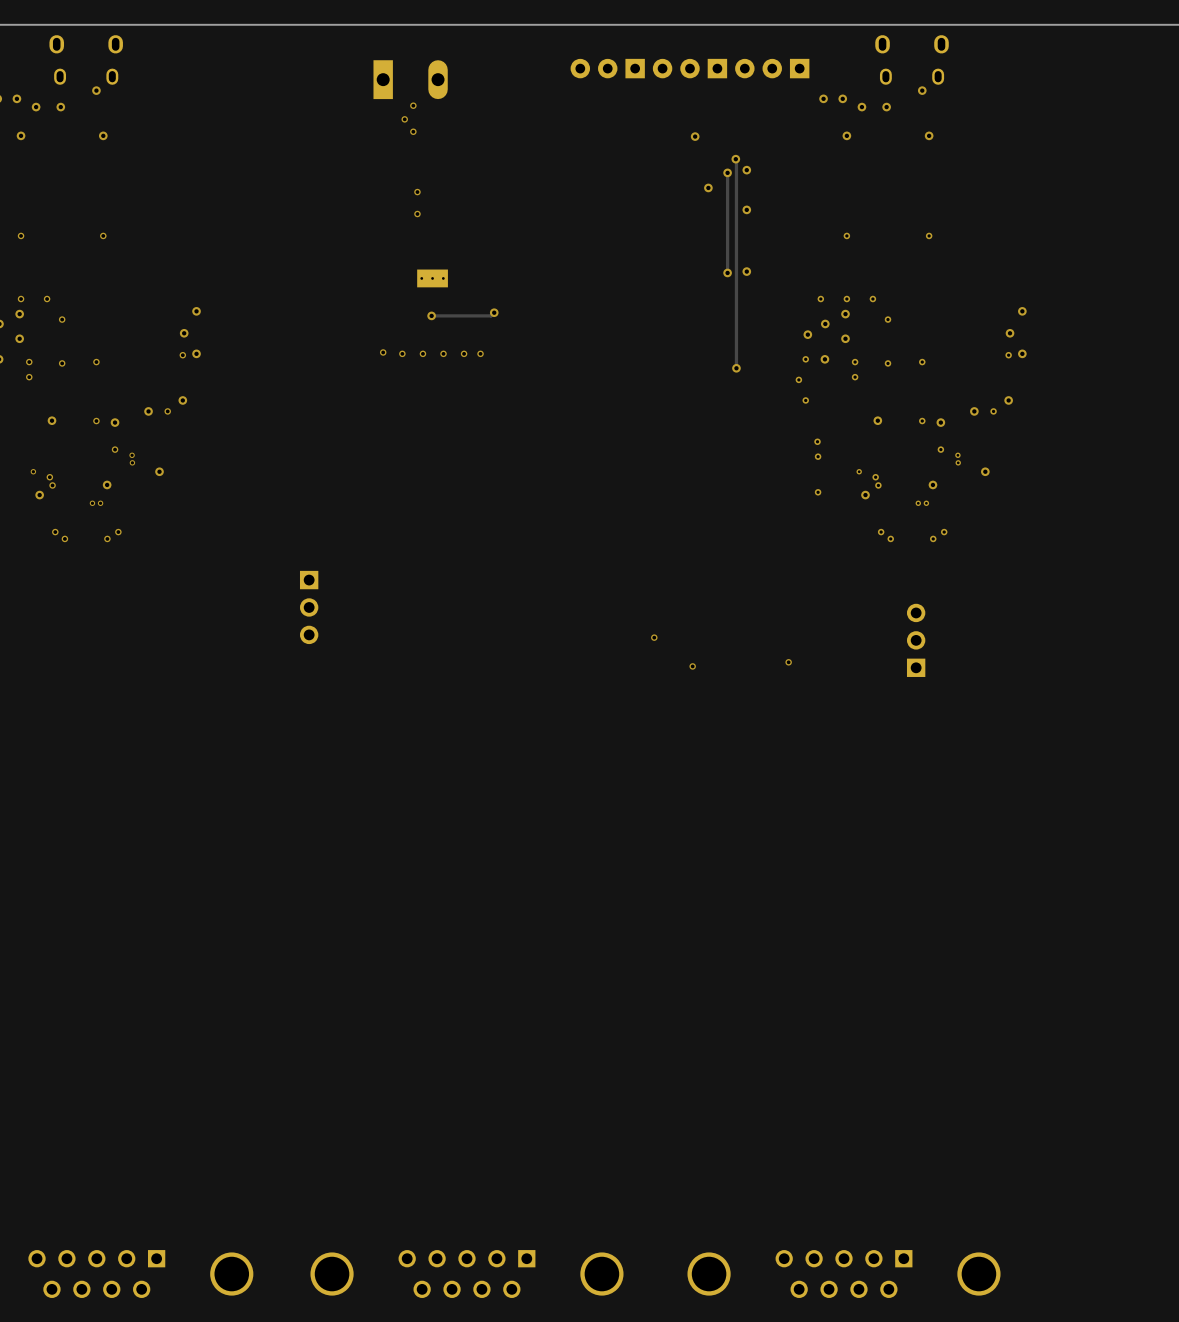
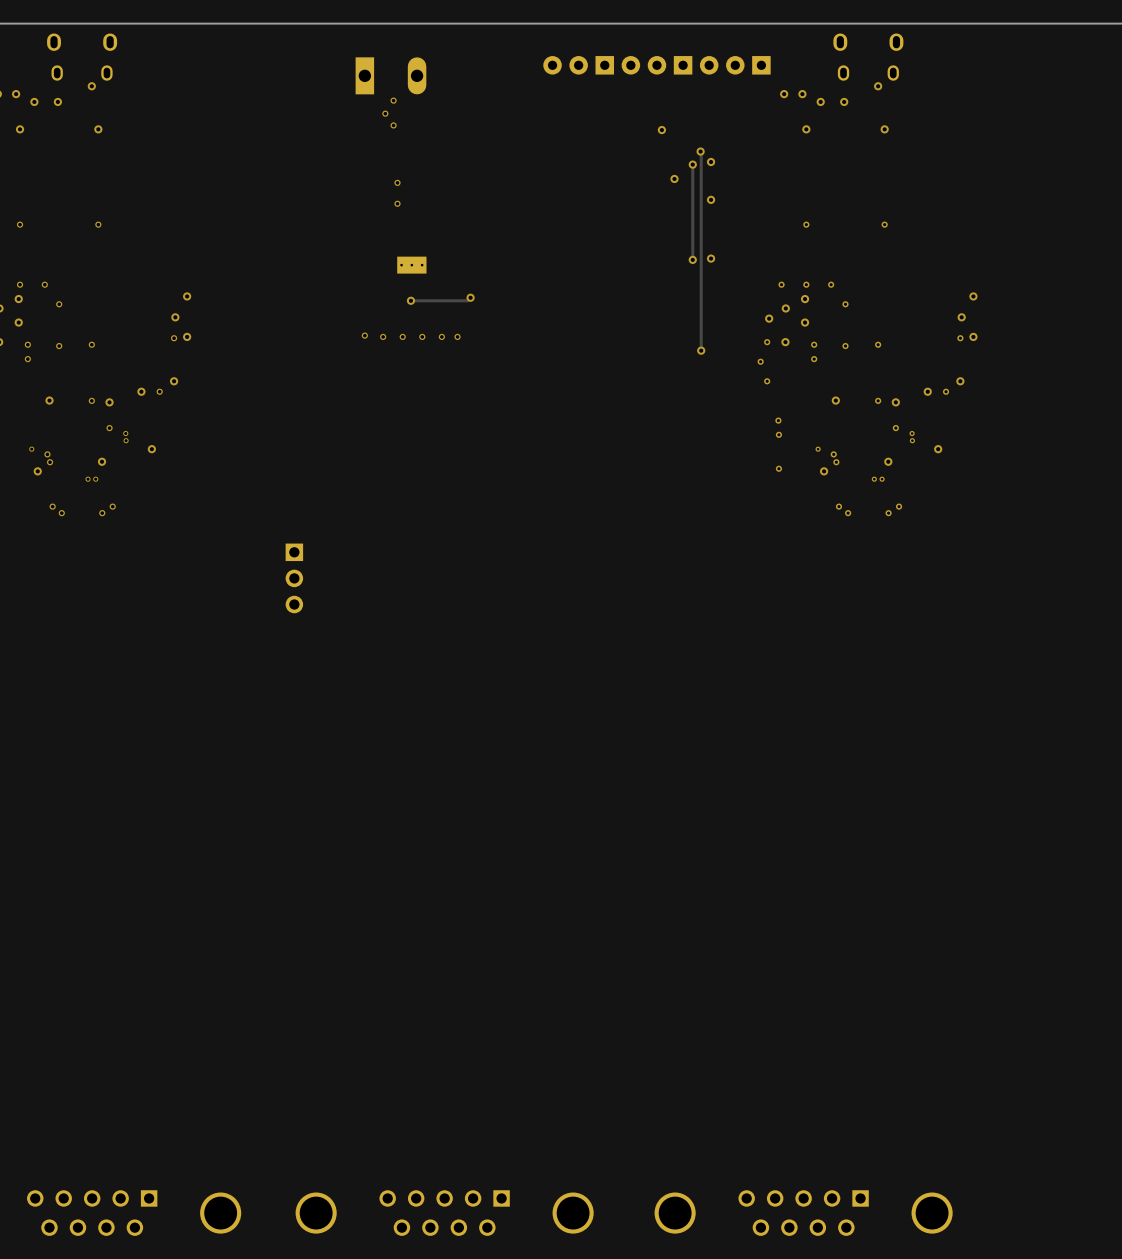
via: (654, 637) -> none
part: (916, 640) -> none
via: (788, 662) -> none
via: (692, 666) -> none

